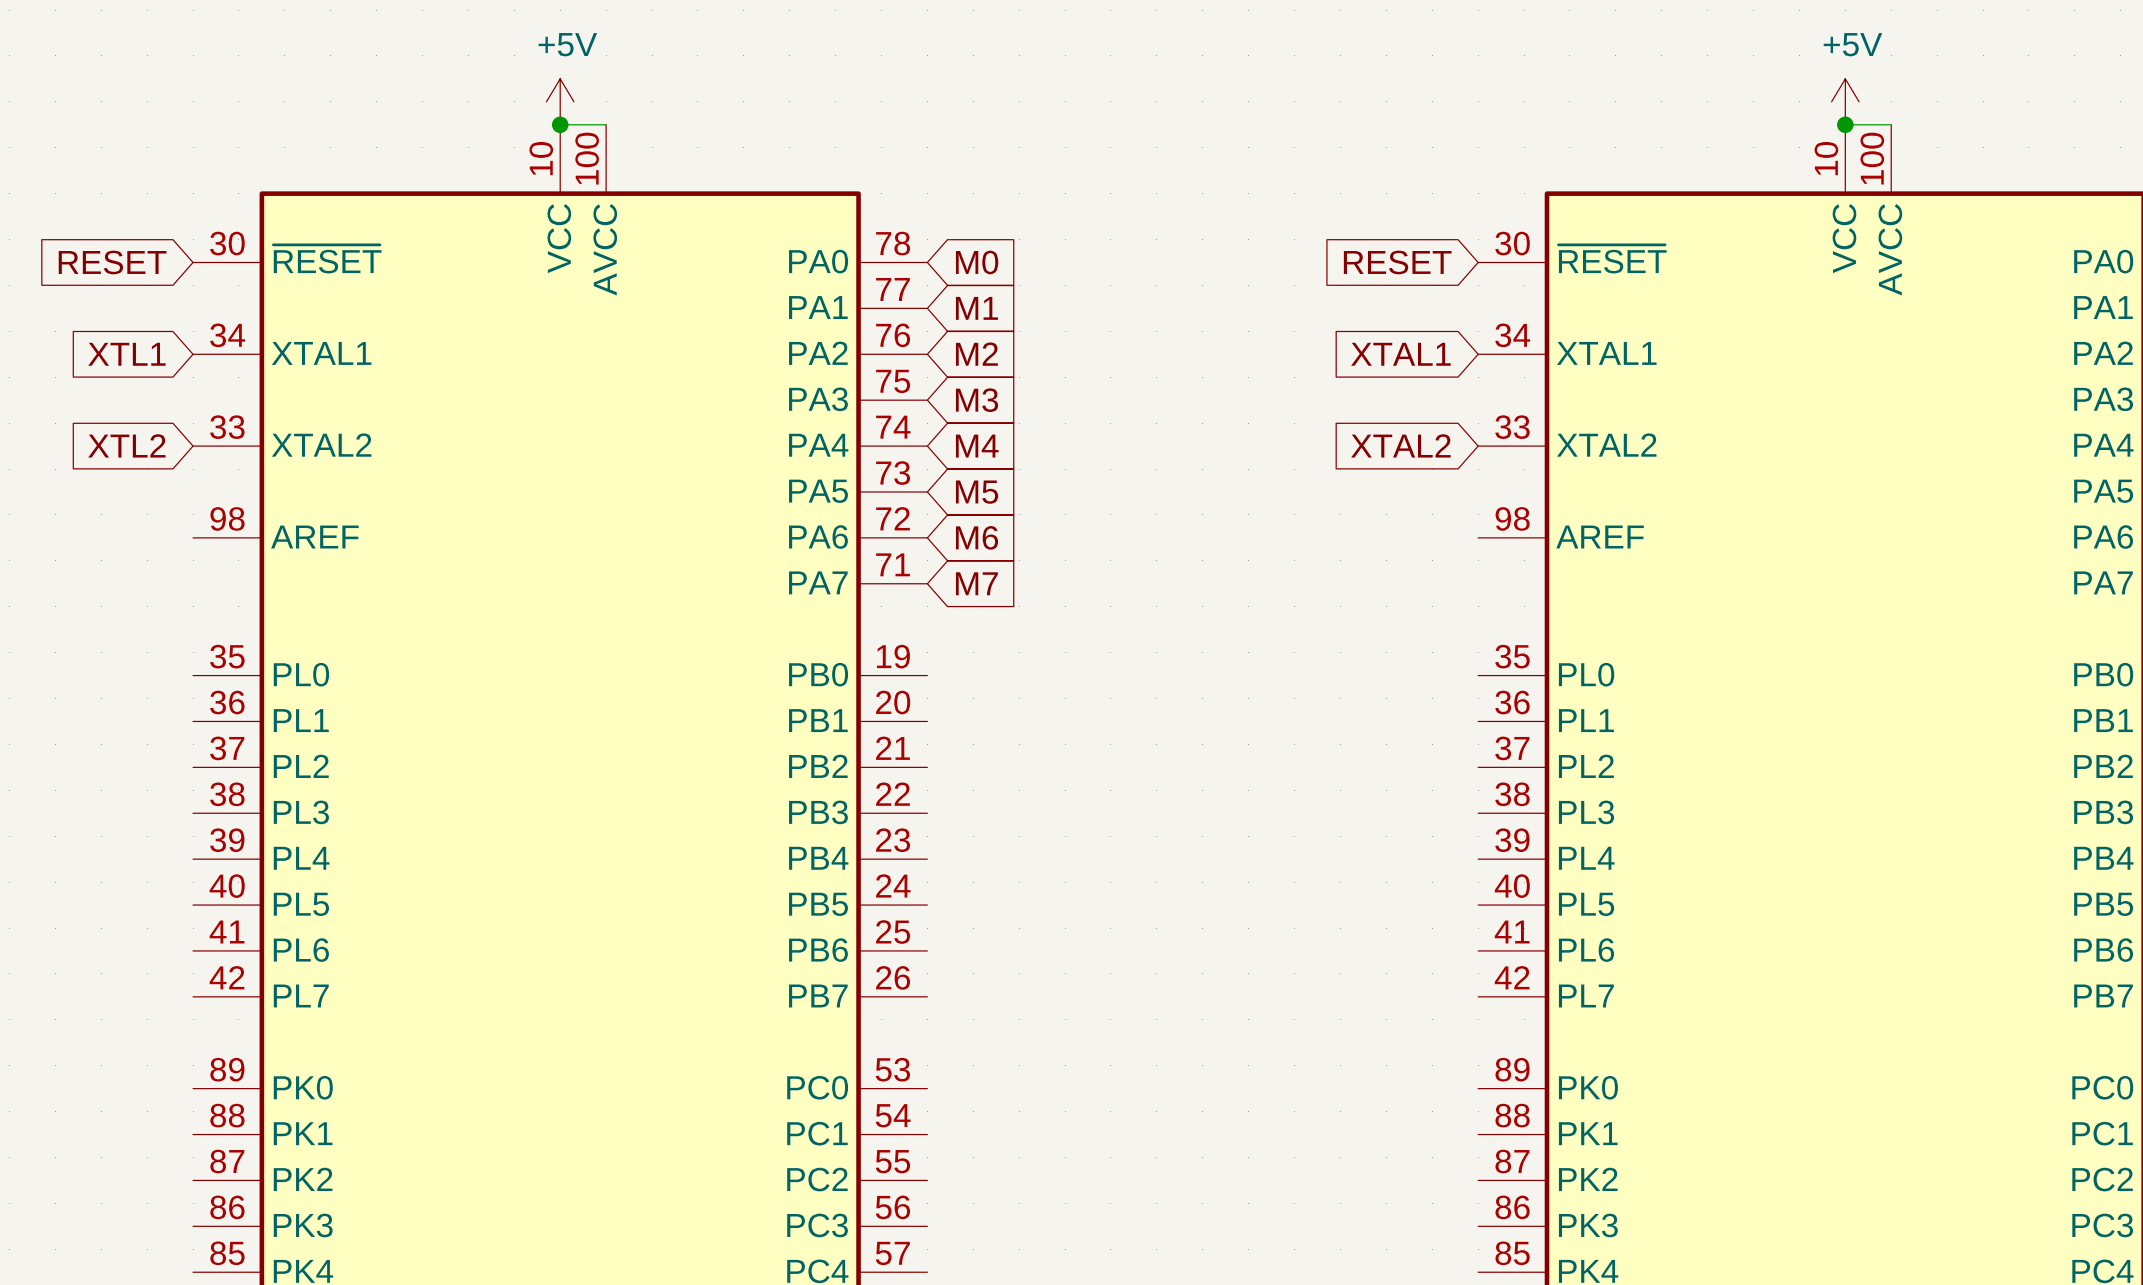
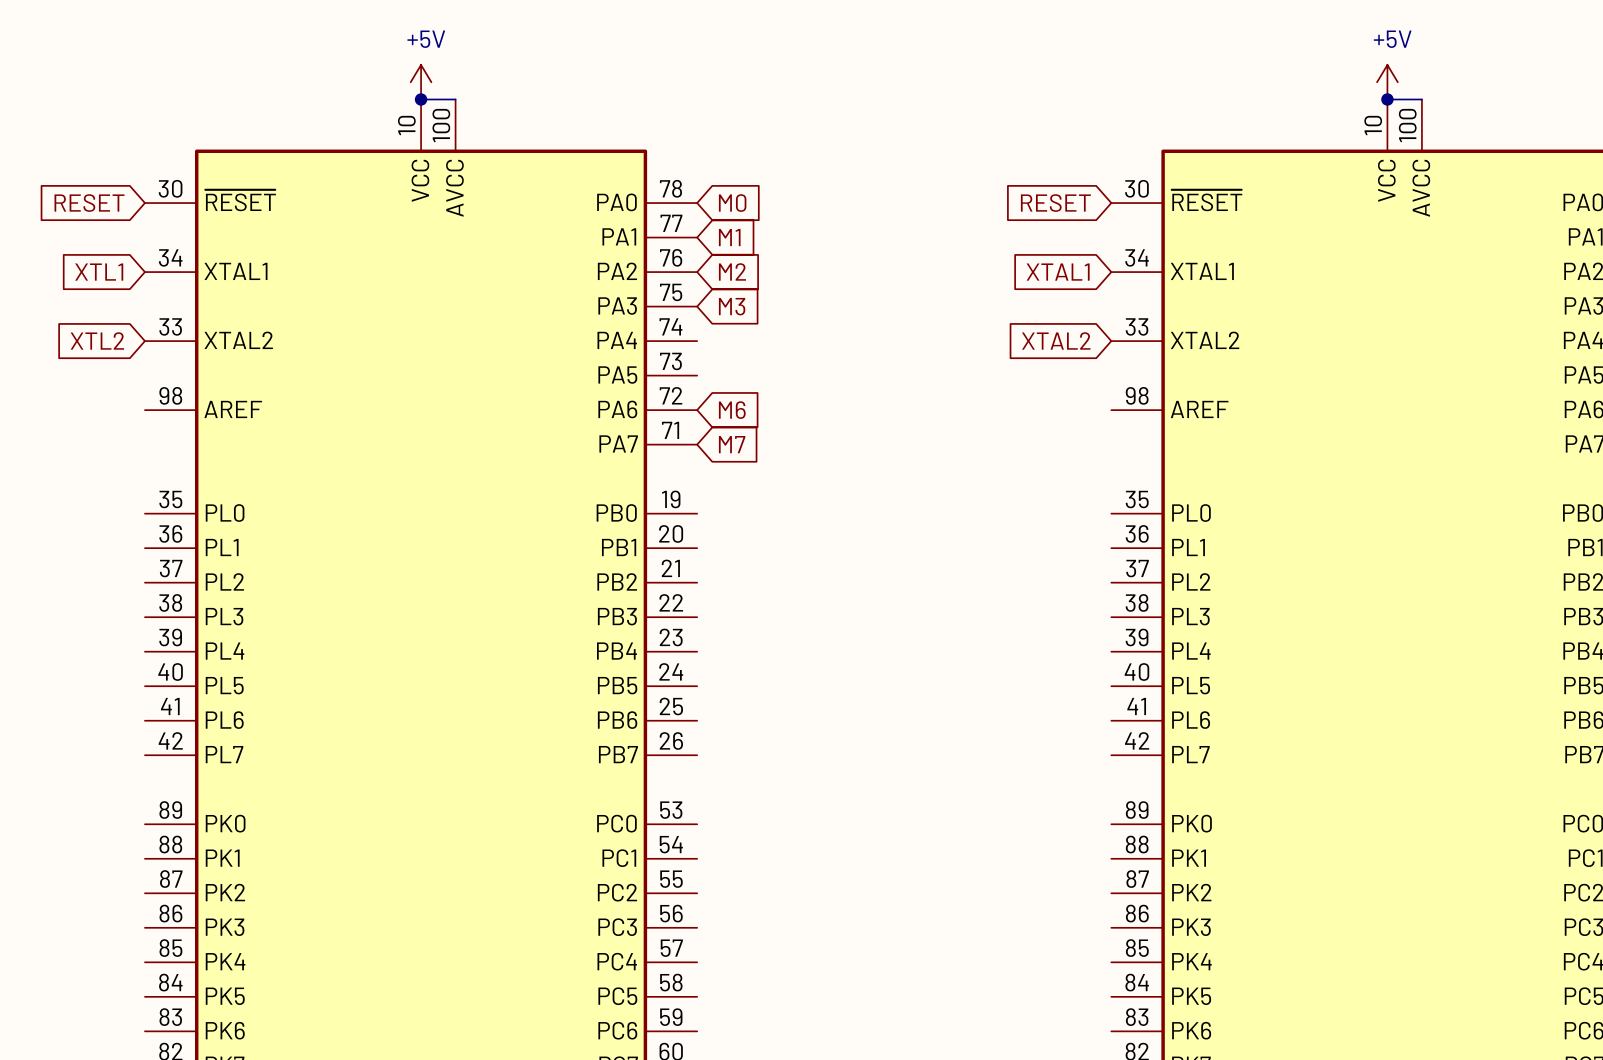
global label: M4 (977, 446) -> none
global label: M5 (977, 492) -> none

